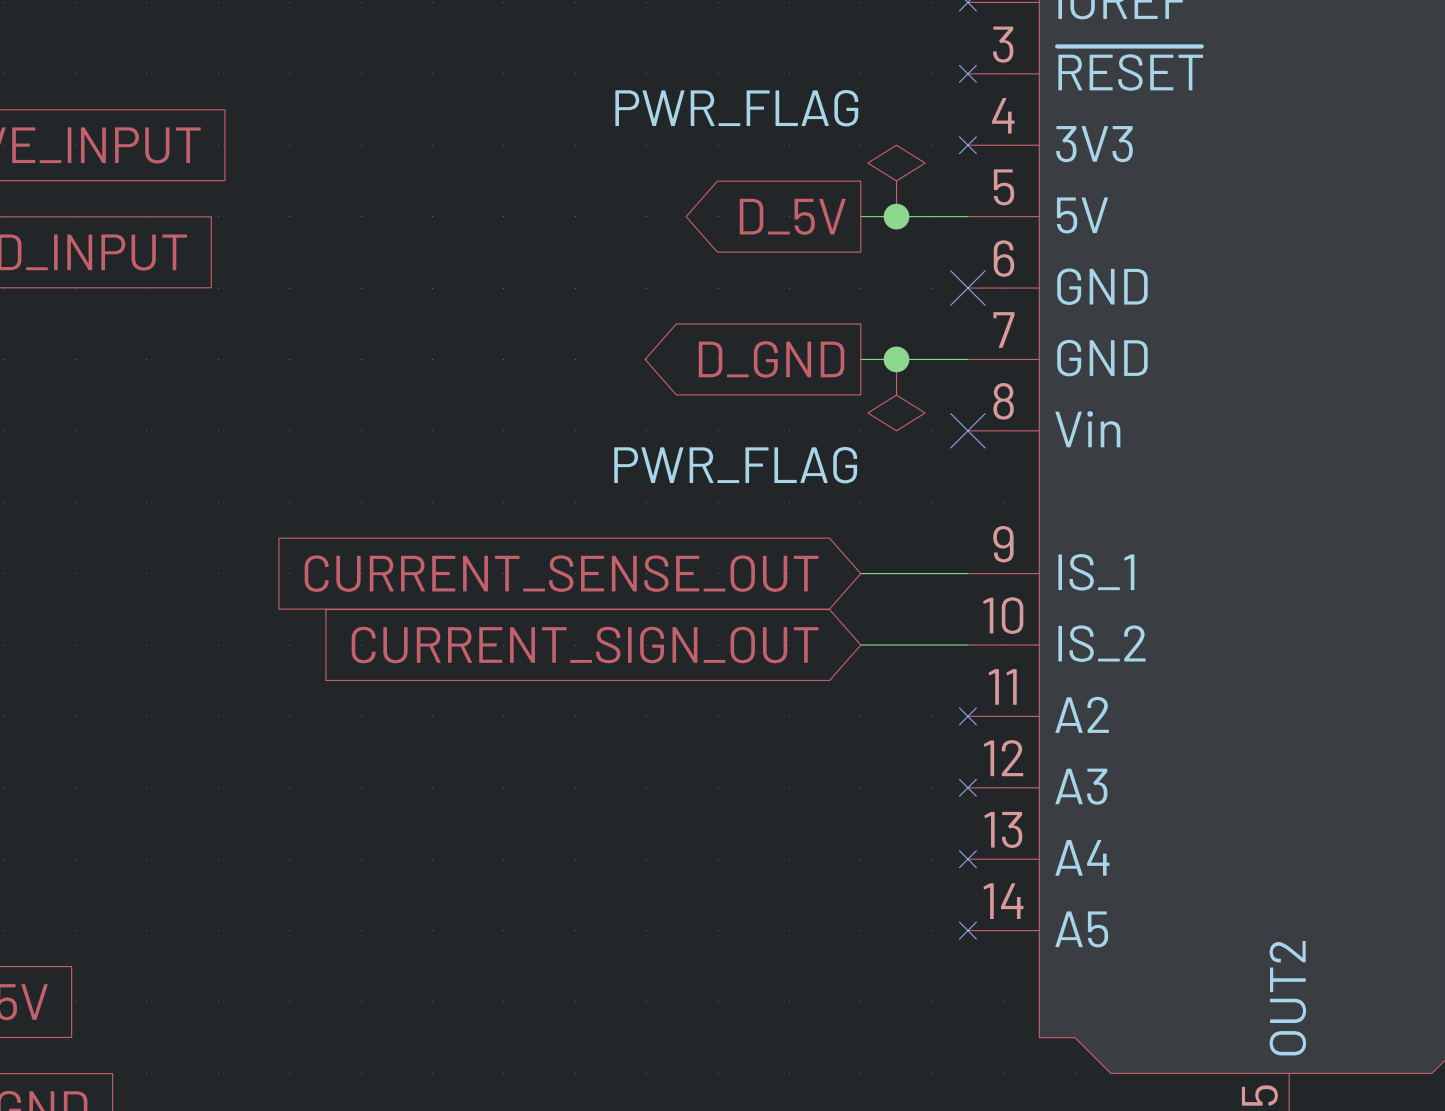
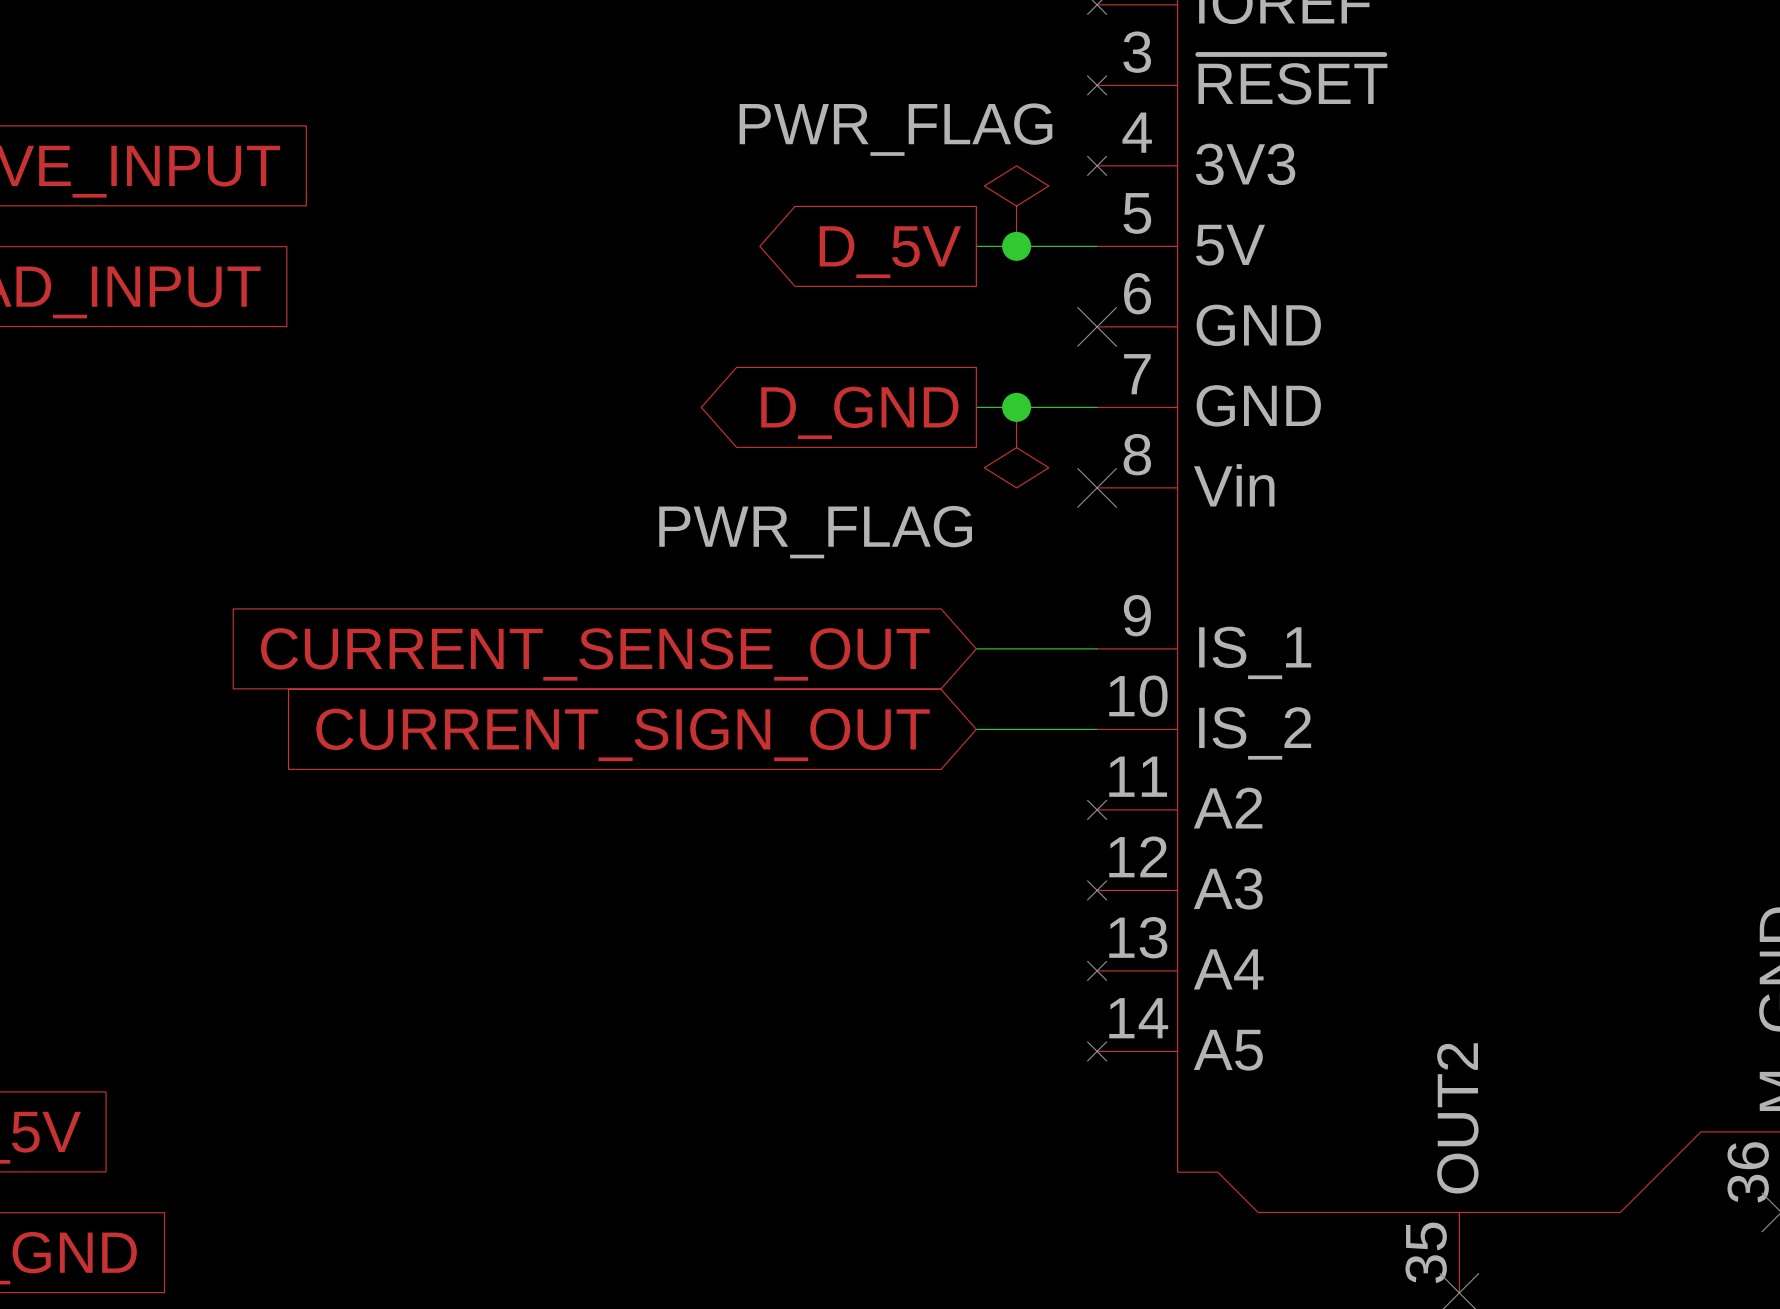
power symbol text position: PWR_FLAG (736, 108) -> PWR_FLAG (895, 129)

